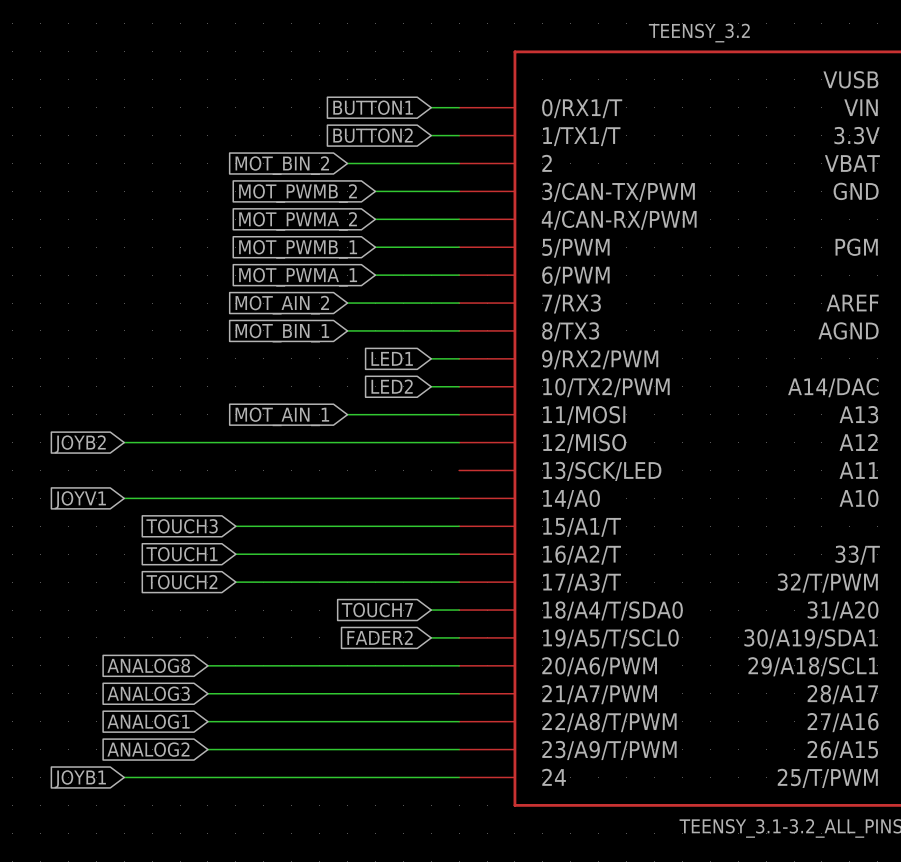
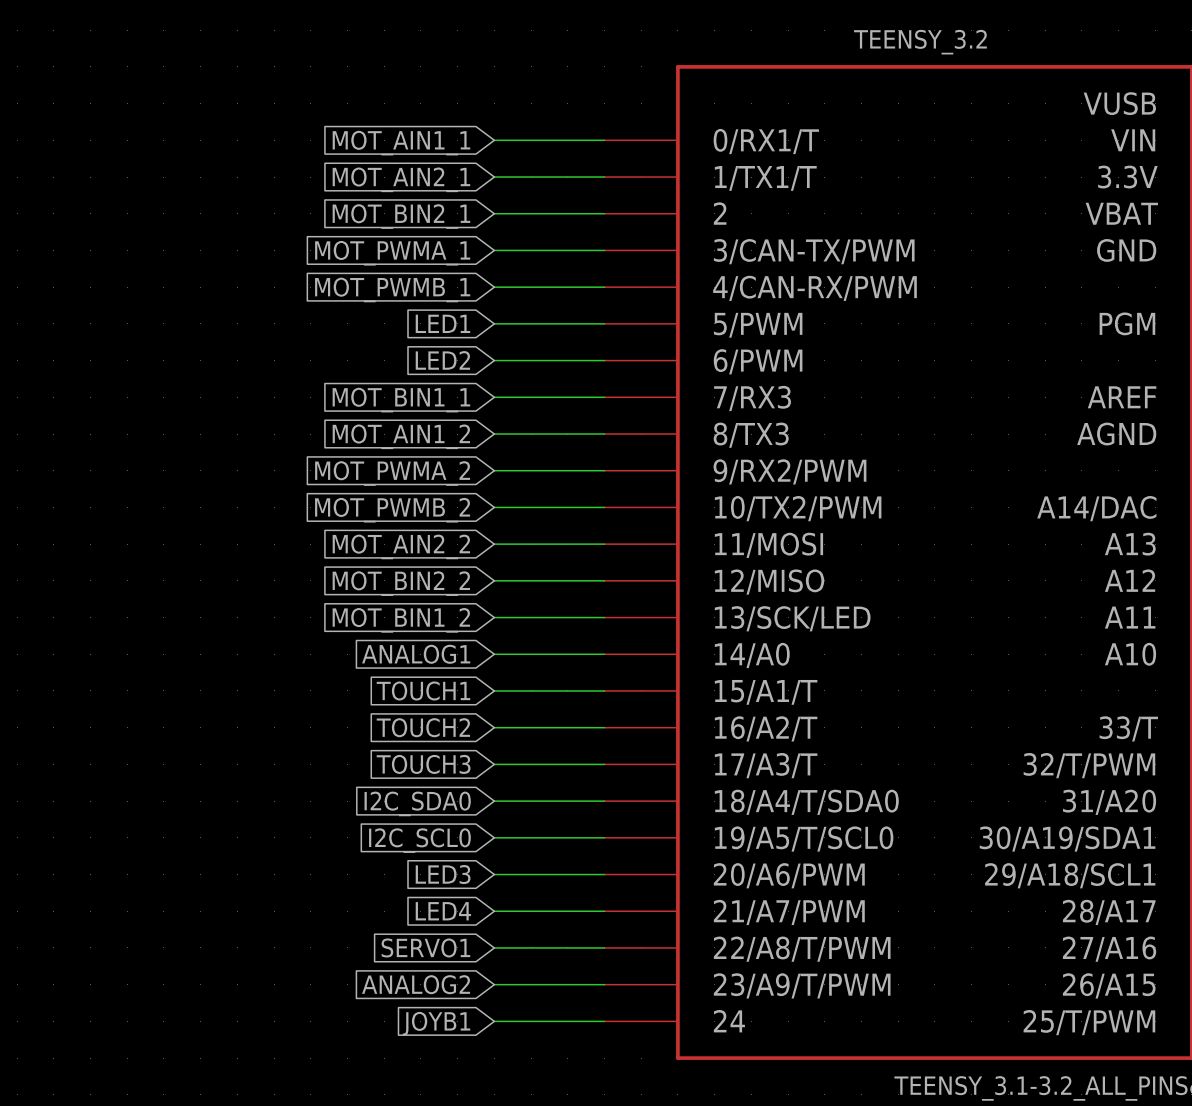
global label: BUTTON1 (373, 107) -> none
wire: none -> (494, 140) (567, 140)
global label: none -> MOT_AIN1_1 (401, 143)
global label: BUTTON2 (373, 135) -> none
wire: none -> (494, 177) (567, 177)
global label: none -> MOT_AIN2_1 (401, 179)
wire: (347, 163) (375, 163) -> none
global label: MOT_BIN_2 (282, 165) -> none
global label: none -> MOT_BIN2_1 (401, 216)
global label: MOT_PWMB_2 (298, 193) -> MOT_PWMA_1 (392, 253)
global label: MOT_PWMA_2 (298, 221) -> MOT_PWMB_1 (392, 289)
global label: MOT_PWMB_1 (298, 249) -> LED1 (442, 323)
global label: MOT_PWMA_1 (298, 277) -> LED2 (442, 360)
wire: (347, 303) (375, 303) -> none
global label: MOT_AIN_2 (282, 305) -> none
global label: none -> MOT_BIN1_1 (401, 400)
wire: (347, 330) (375, 330) -> none
global label: MOT_BIN_1 (282, 333) -> none
global label: none -> MOT_AIN1_2 (401, 436)
wire: none -> (494, 470) (567, 470)
global label: LED1 (392, 358) -> none
global label: none -> MOT_PWMA_2 (392, 473)
wire: none -> (494, 507) (567, 507)
global label: LED2 (392, 386) -> none
global label: none -> MOT_PWMB_2 (392, 510)
wire: (347, 414) (375, 414) -> none
global label: MOT_AIN_1 (282, 416) -> none
global label: none -> MOT_AIN2_2 (401, 546)
wire: (124, 442) (375, 442) -> none
global label: JOYB2 (80, 444) -> none
global label: none -> MOT_BIN2_2 (401, 583)
wire: none -> (494, 617) (604, 617)
global label: none -> MOT_BIN1_2 (401, 620)
wire: (124, 498) (375, 498) -> none
global label: none -> ANALOG1 (416, 654)
global label: JOYV1 (80, 500) -> none
global label position: TOUCH3 (182, 526) -> TOUCH3 (423, 764)
wire: (235, 526) (375, 526) -> none
global label position: TOUCH1 (181, 554) -> TOUCH1 (423, 691)
wire: (235, 554) (375, 554) -> none
global label position: TOUCH2 (181, 582) -> TOUCH2 (423, 727)
wire: (235, 582) (375, 582) -> none
wire: none -> (494, 801) (567, 801)
global label: TOUCH7 (377, 610) -> none
global label: none -> I2C_SDA0 (417, 803)
wire: none -> (494, 837) (567, 837)
global label: FADER2 (380, 637) -> none
global label: none -> I2C_SCL0 (419, 840)
global label: ANALOG8 (148, 665) -> none
wire: (207, 665) (375, 665) -> none
global label: none -> LED3 (443, 874)
global label: ANALOG3 (148, 693) -> none
wire: (207, 693) (375, 693) -> none
global label: none -> LED4 (443, 911)
global label: ANALOG1 (148, 721) -> none
wire: (207, 721) (375, 721) -> none
global label: none -> SERVO1 (425, 947)
global label position: ANALOG2 (148, 749) -> ANALOG2 (416, 984)
wire: (207, 749) (375, 749) -> none
wire: (124, 777) (375, 777) -> none
global label position: JOYB1 (80, 779) -> JOYB1 (436, 1023)

